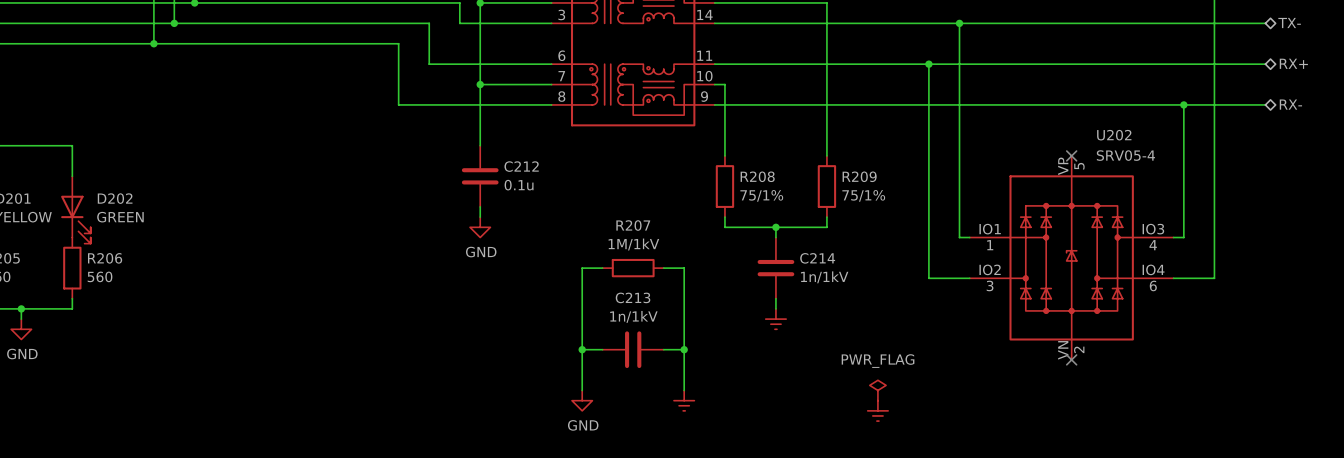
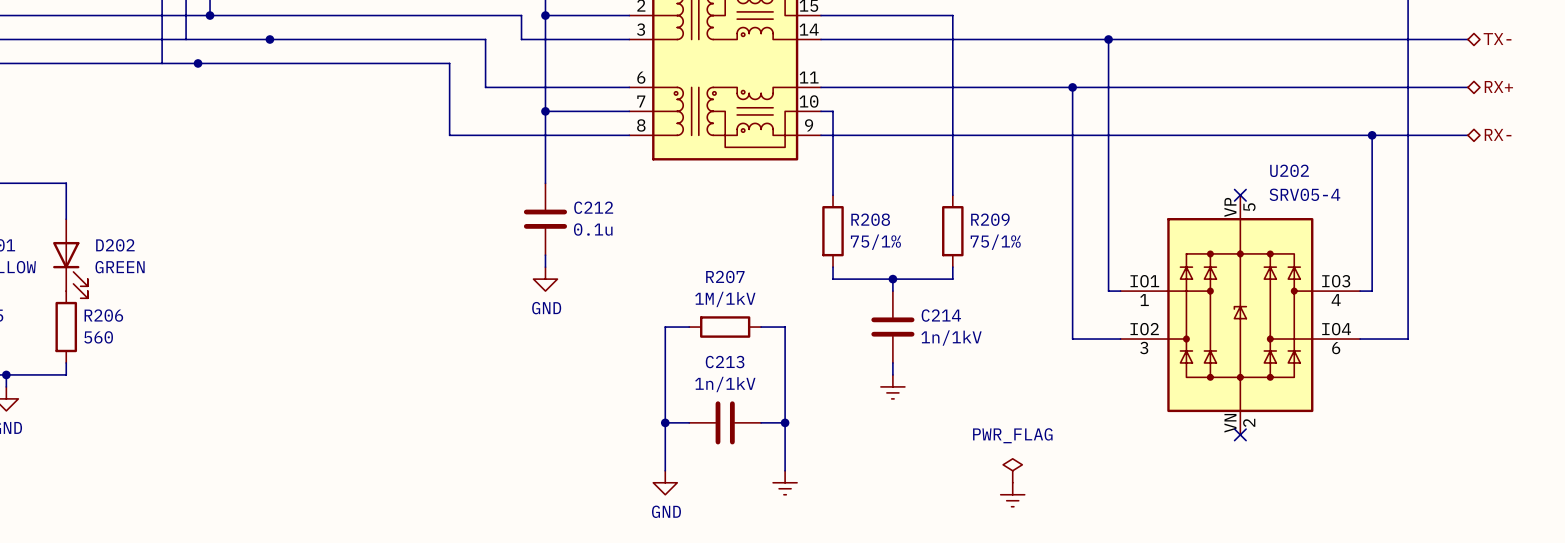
junction: (174, 23) -> none
junction: none -> (269, 39)
junction: (153, 43) -> none
junction: none -> (198, 63)

